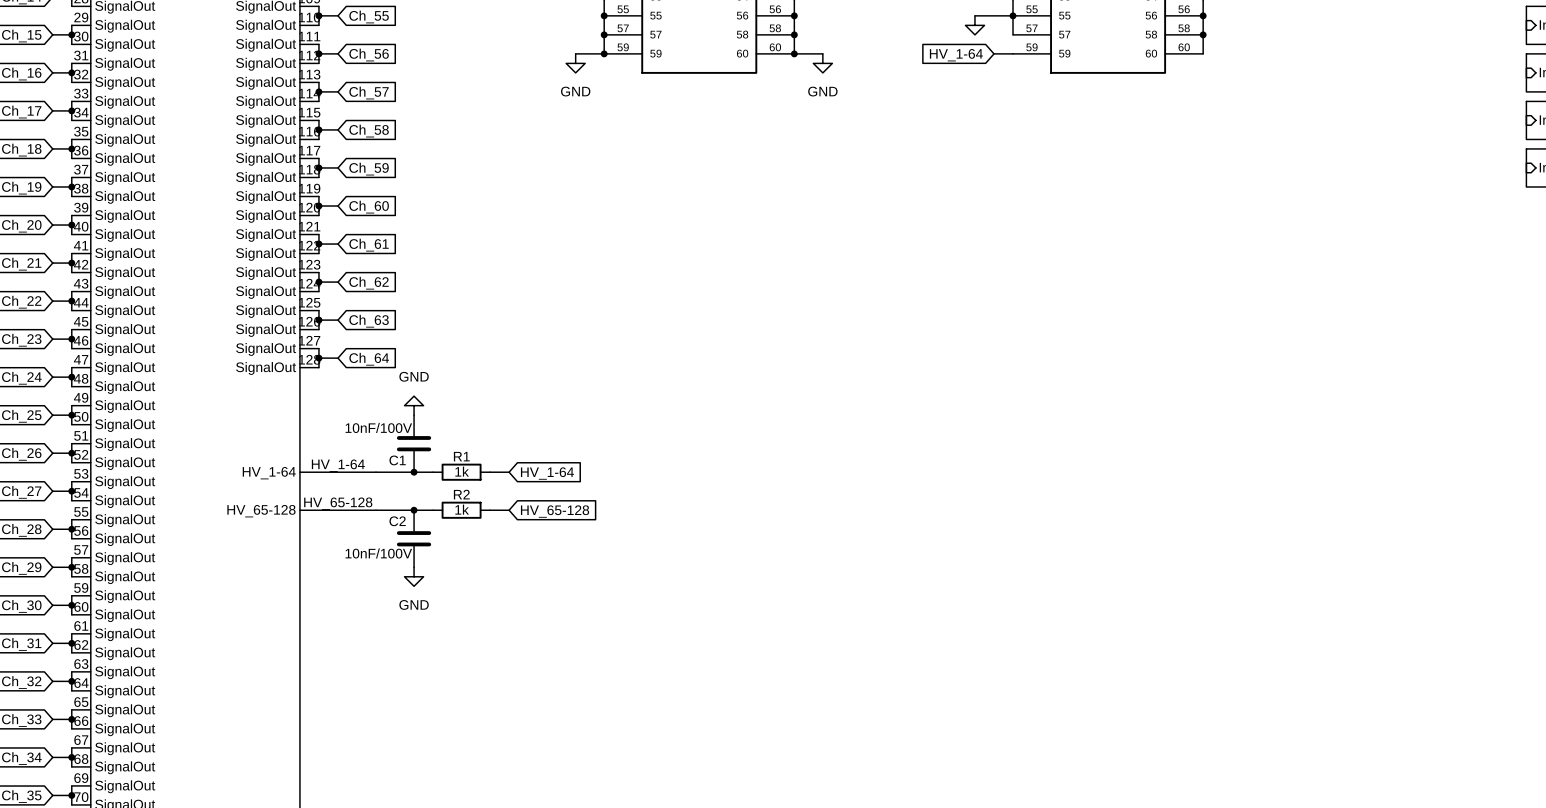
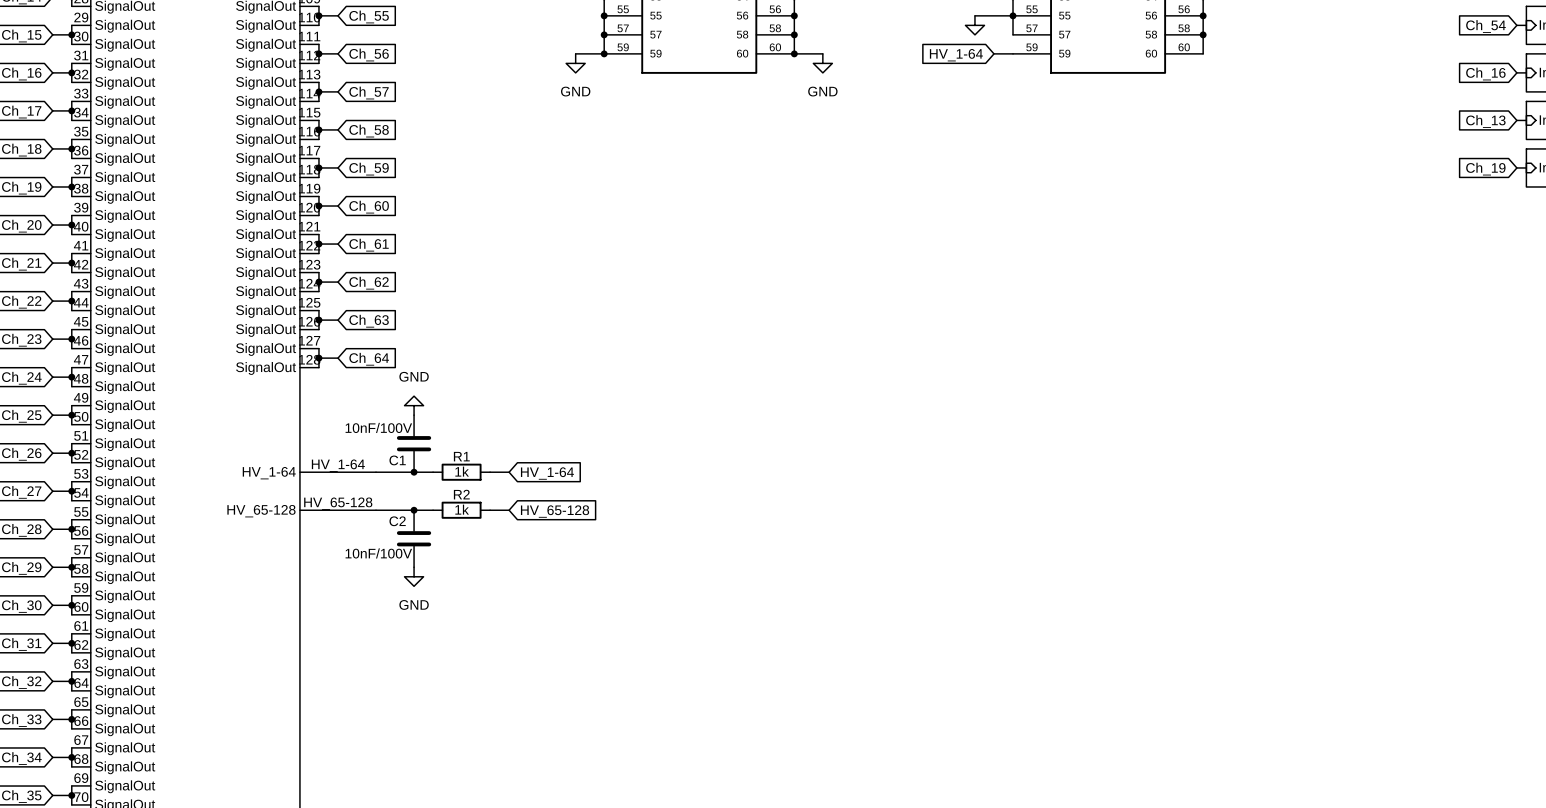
wire: none -> (1516, 25) (1526, 25)
global label: none -> Ch_54 (1485, 26)
wire: none -> (1516, 72) (1526, 72)
global label: none -> Ch_16 (1485, 74)
wire: none -> (1516, 120) (1526, 120)
global label: none -> Ch_13 (1485, 121)
wire: none -> (1516, 167) (1526, 167)
global label: none -> Ch_19 (1485, 169)

